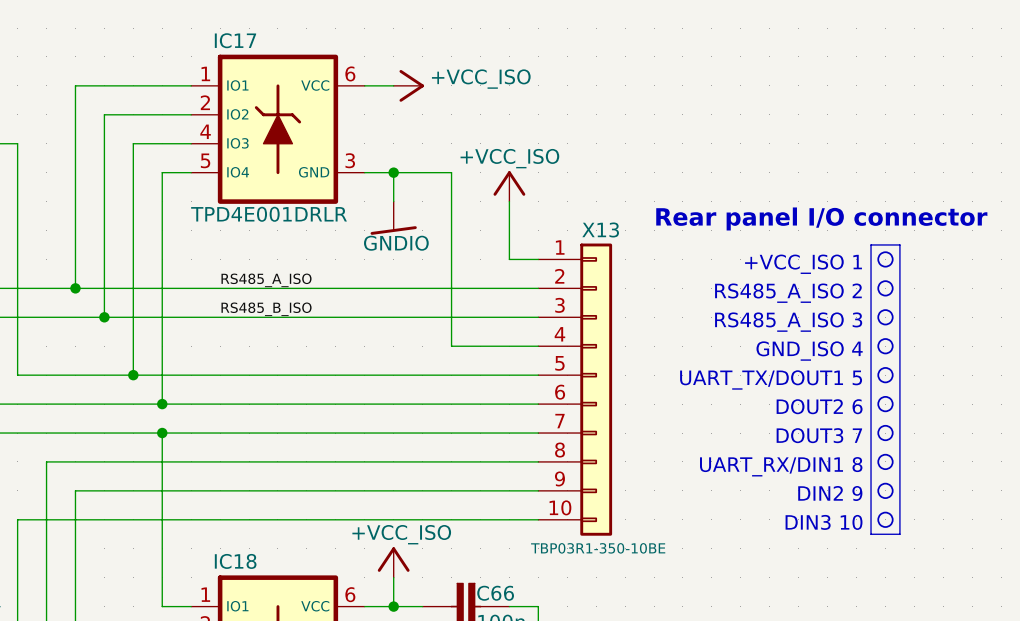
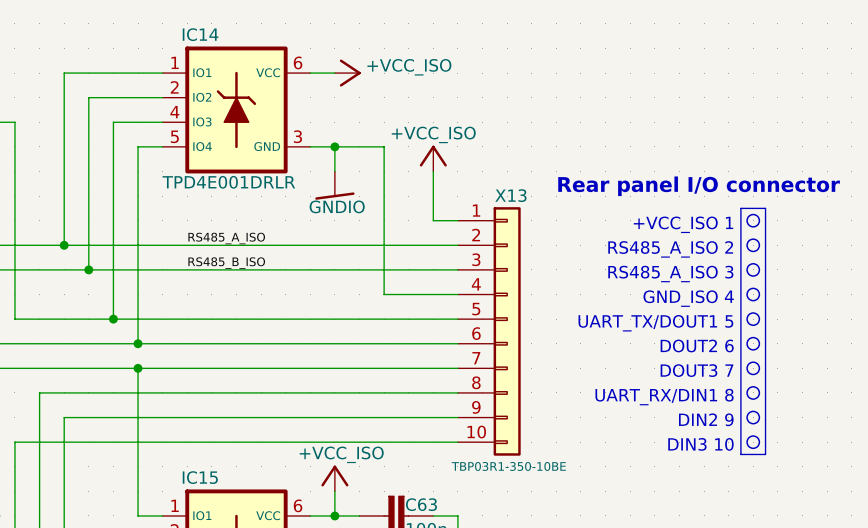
IC17 name: IC17 (235, 40) -> IC14 (200, 34)
IC18 name: IC18 (235, 561) -> IC15 (200, 477)
C66 name: C66 (495, 593) -> C63 (421, 504)

